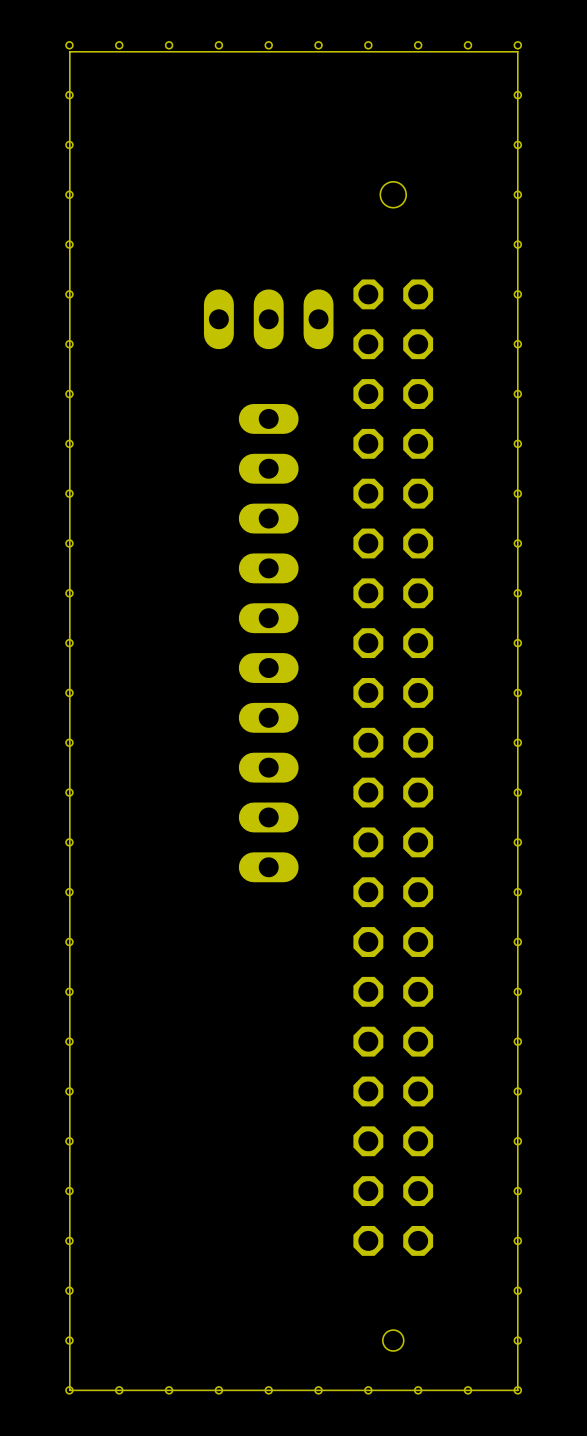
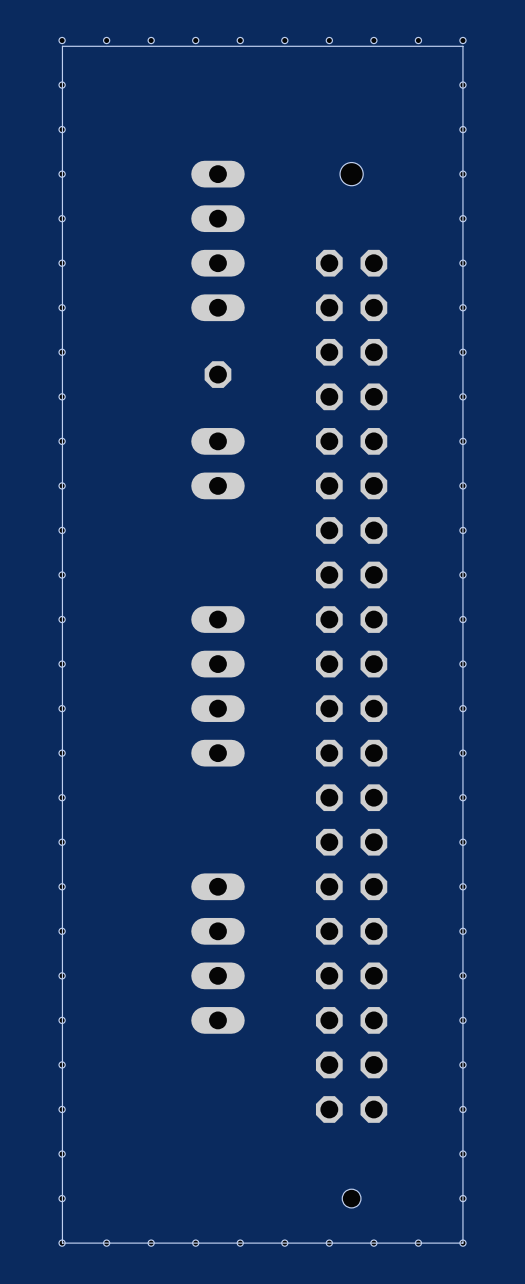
part: none -> (217, 240)
part: (268, 319) -> none
part: none -> (217, 374)
part: none -> (217, 463)
part: (268, 643) -> none
part: none -> (217, 686)
part: none -> (217, 953)

